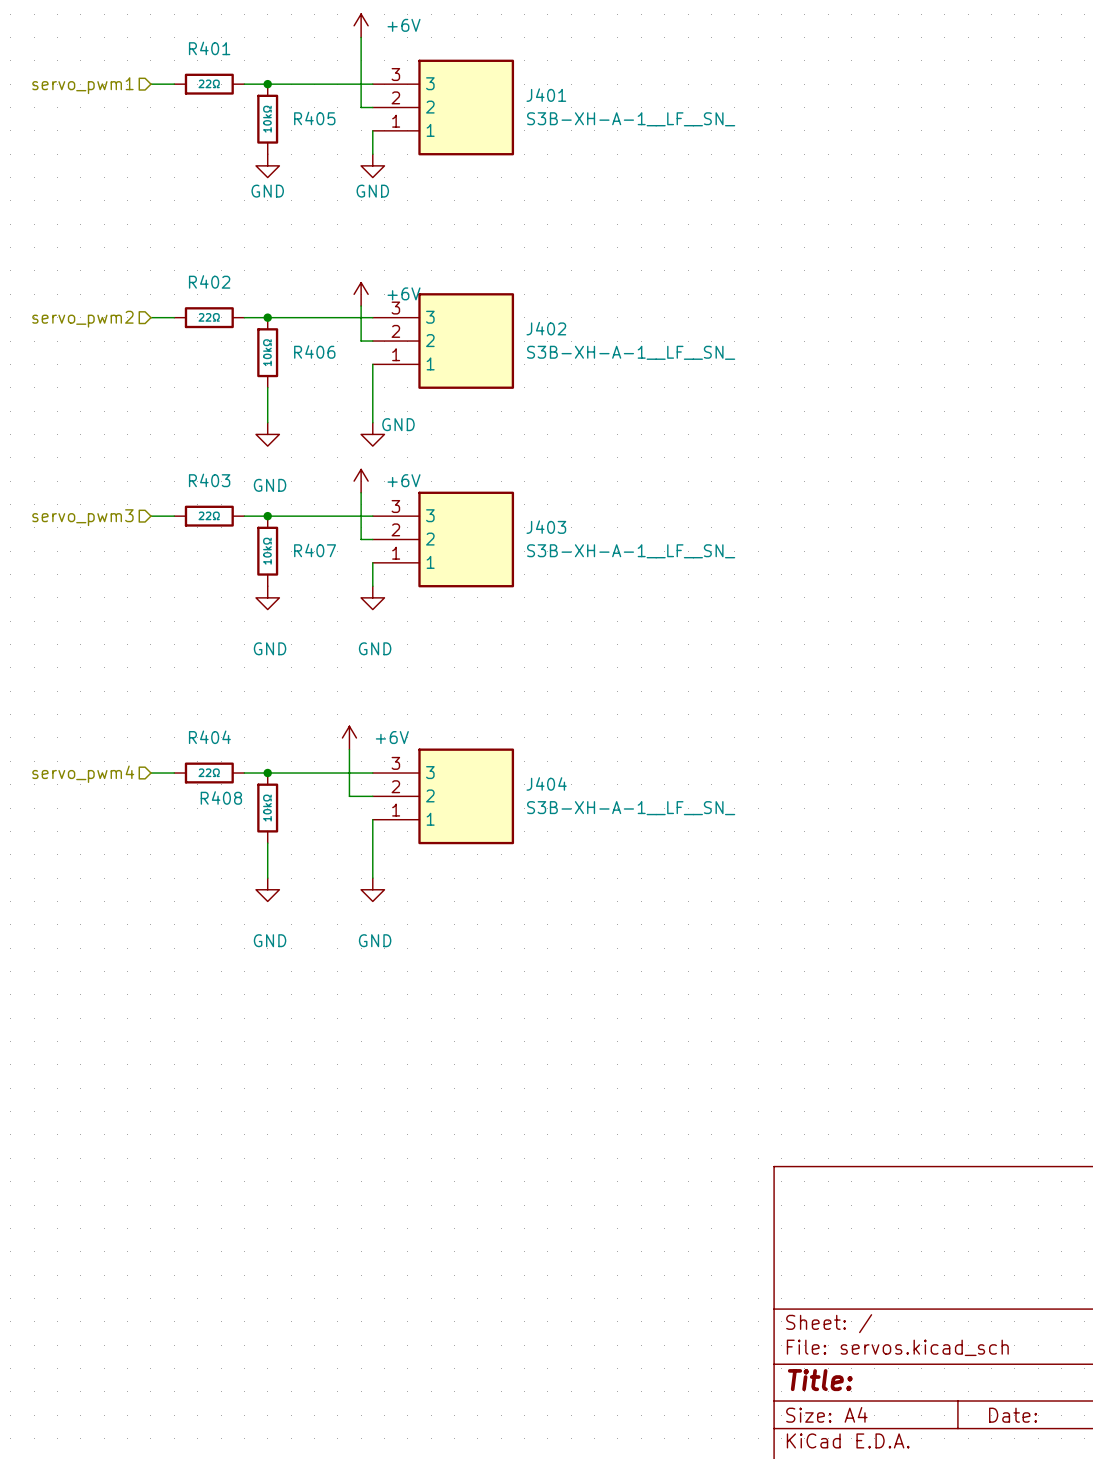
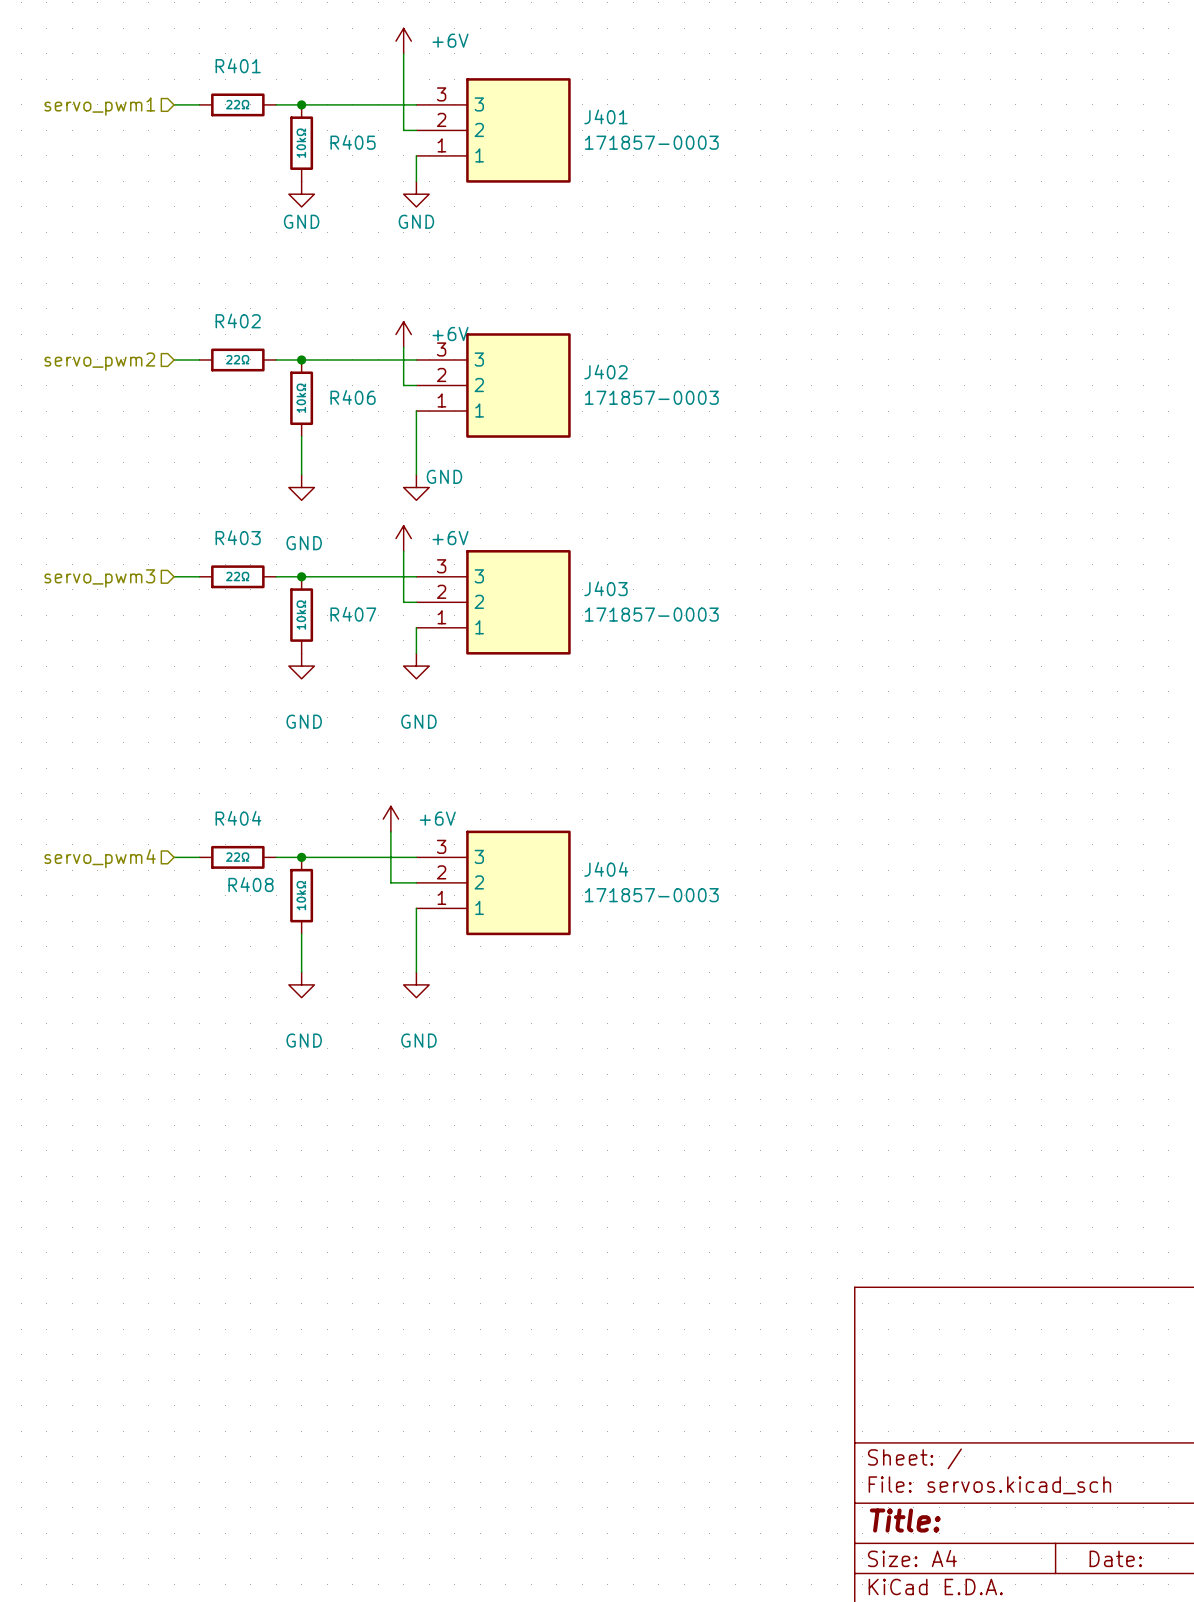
J401 value: S3B-XH-A-1__LF__SN_ (631, 119) -> 171857-0003 (651, 142)
J402 value: S3B-XH-A-1__LF__SN_ (631, 352) -> 171857-0003 (651, 397)
J403 value: S3B-XH-A-1__LF__SN_ (631, 551) -> 171857-0003 (651, 614)
J404 value: S3B-XH-A-1__LF__SN_ (631, 808) -> 171857-0003 (651, 895)

